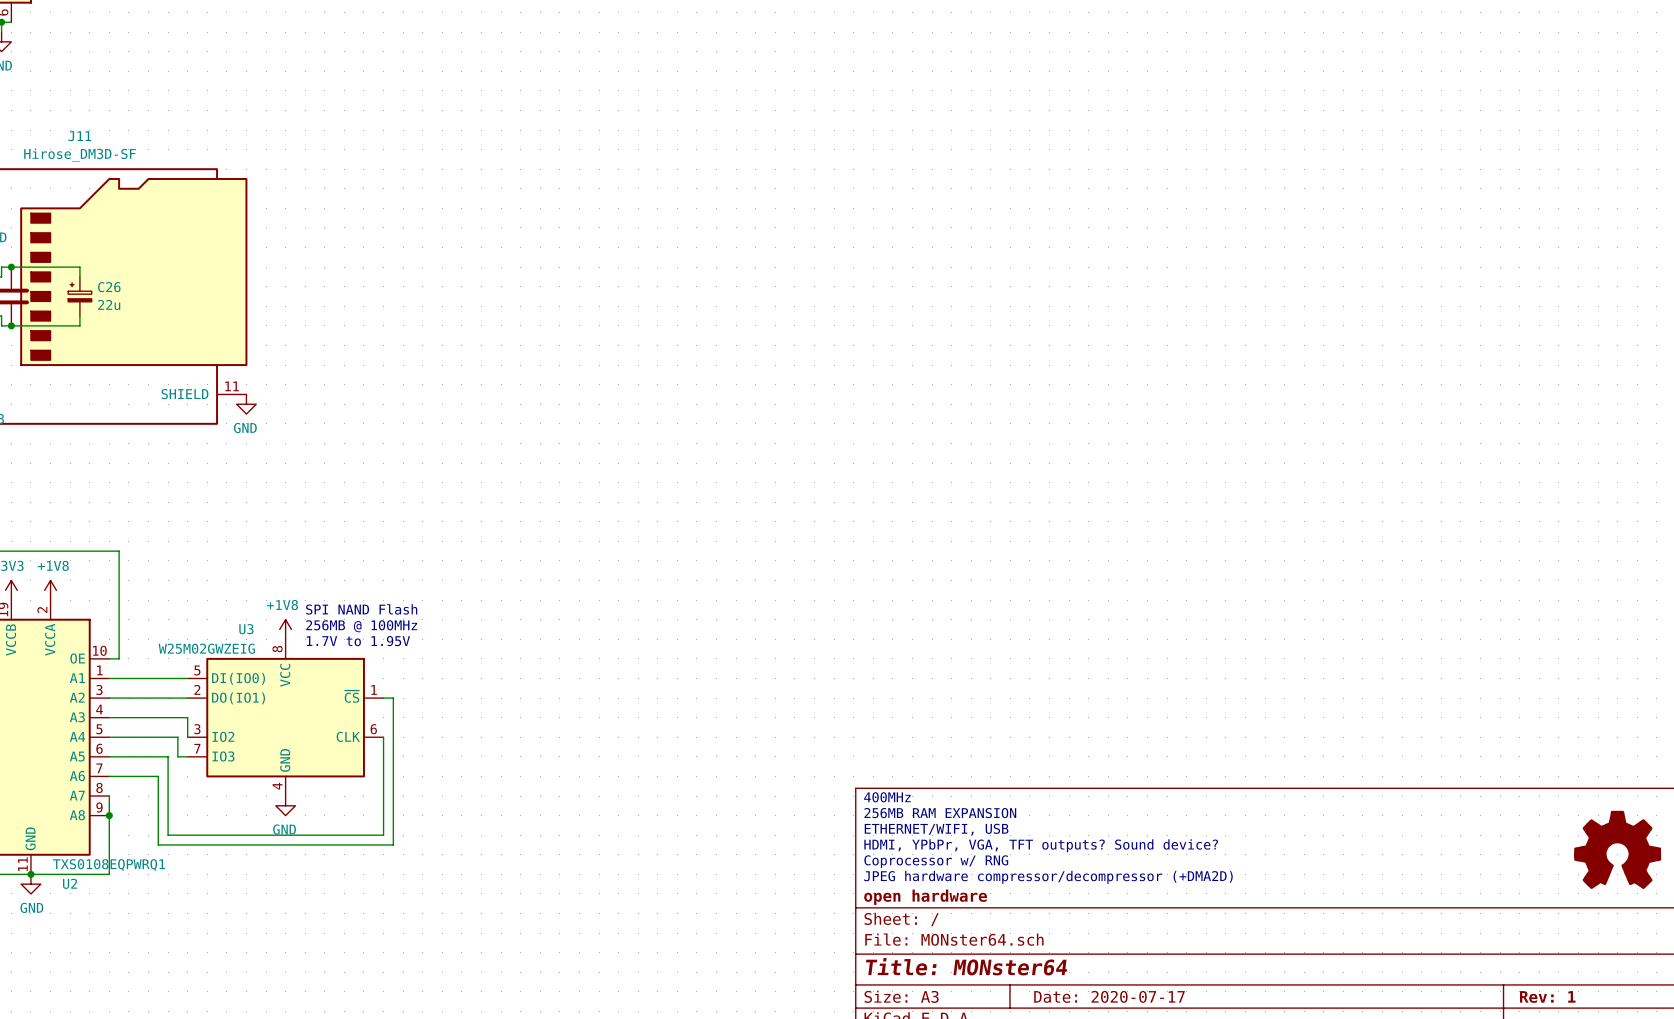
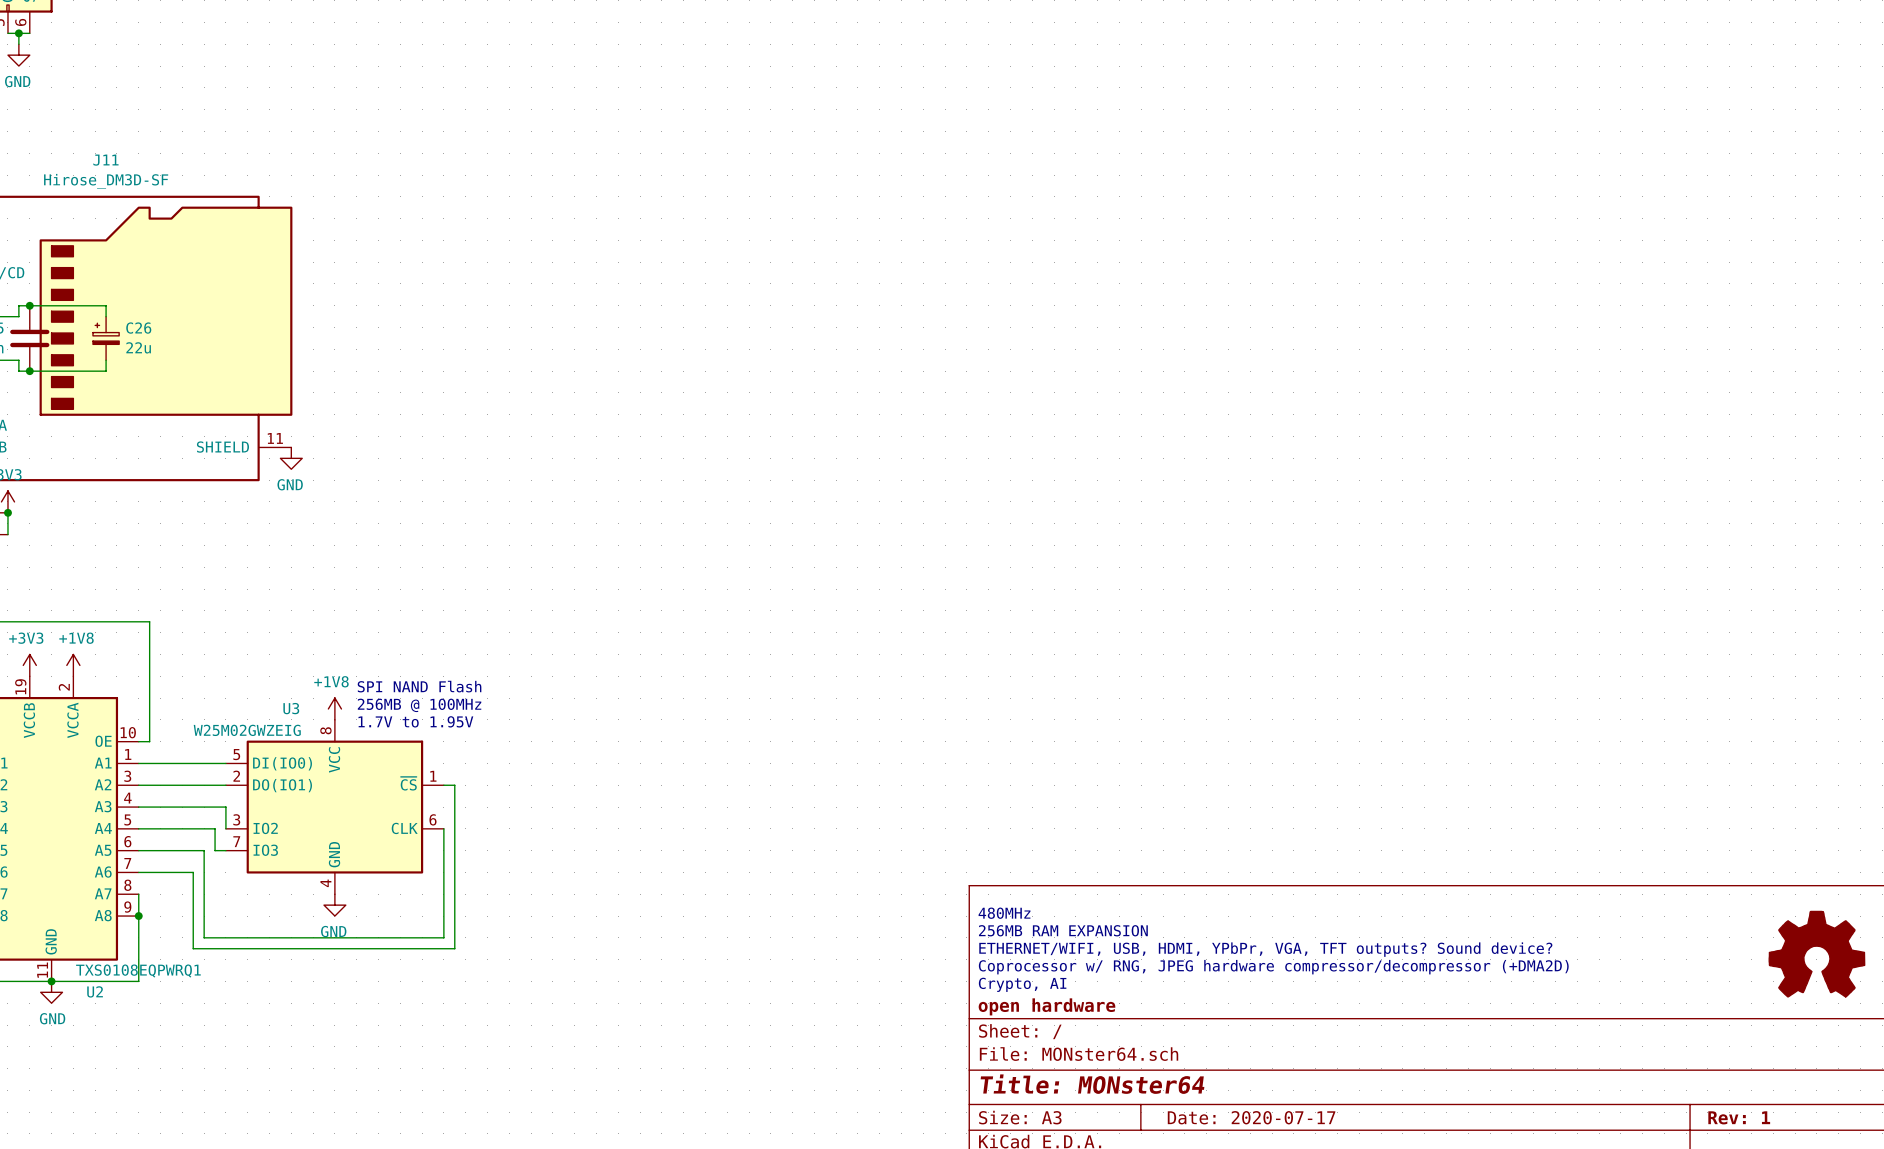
text: 400MHz (887, 797) -> none
text: 256MB RAM EXPANSION (940, 813) -> 480MHz (1004, 913)
text: ETHERNET/WIFI, USB (936, 829) -> 256MB RAM EXPANSION (1063, 930)
text: HDMI, YPbPr, VGA, TFT outputs? Sound device? (1041, 845) -> ETHERNET/WIFI, USB, HDMI, YPbPr, VGA, TFT outputs? Sound device? (1265, 949)
text: Coprocessor w/ RNG (936, 861) -> Coprocessor w/ RNG, JPEG hardware compressor/decompressor (+DMA2D) (1273, 967)
text: JPEG hardware compressor/decompressor (+DMA2D) (1048, 877) -> Crypto, AI (1022, 984)

